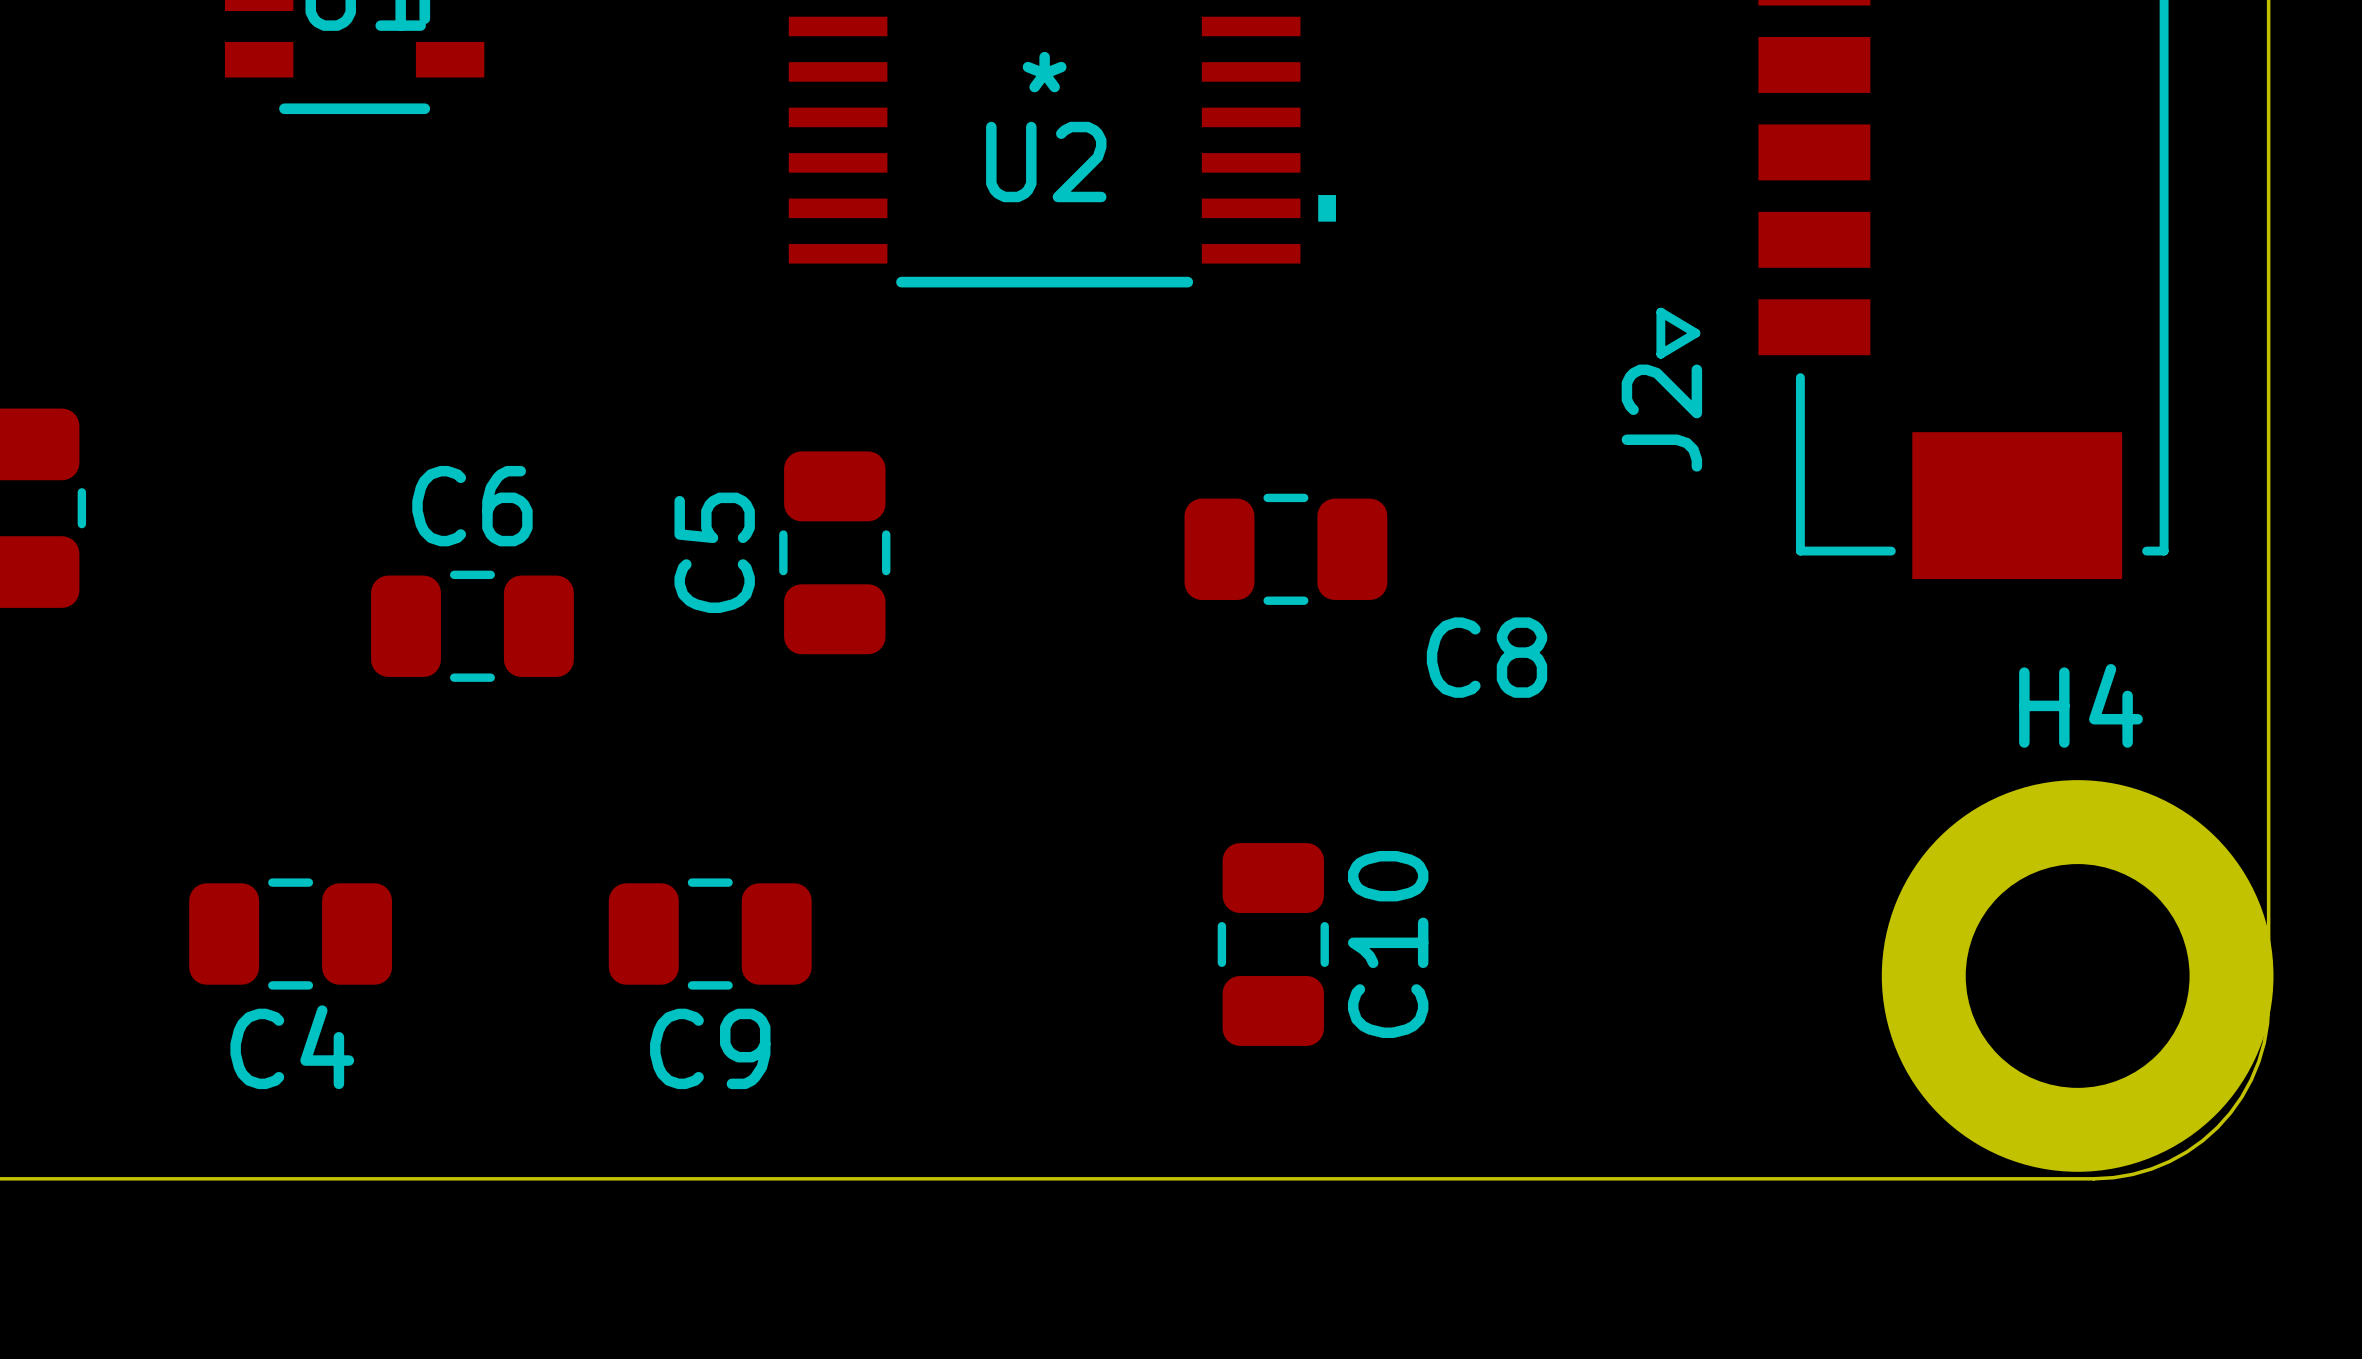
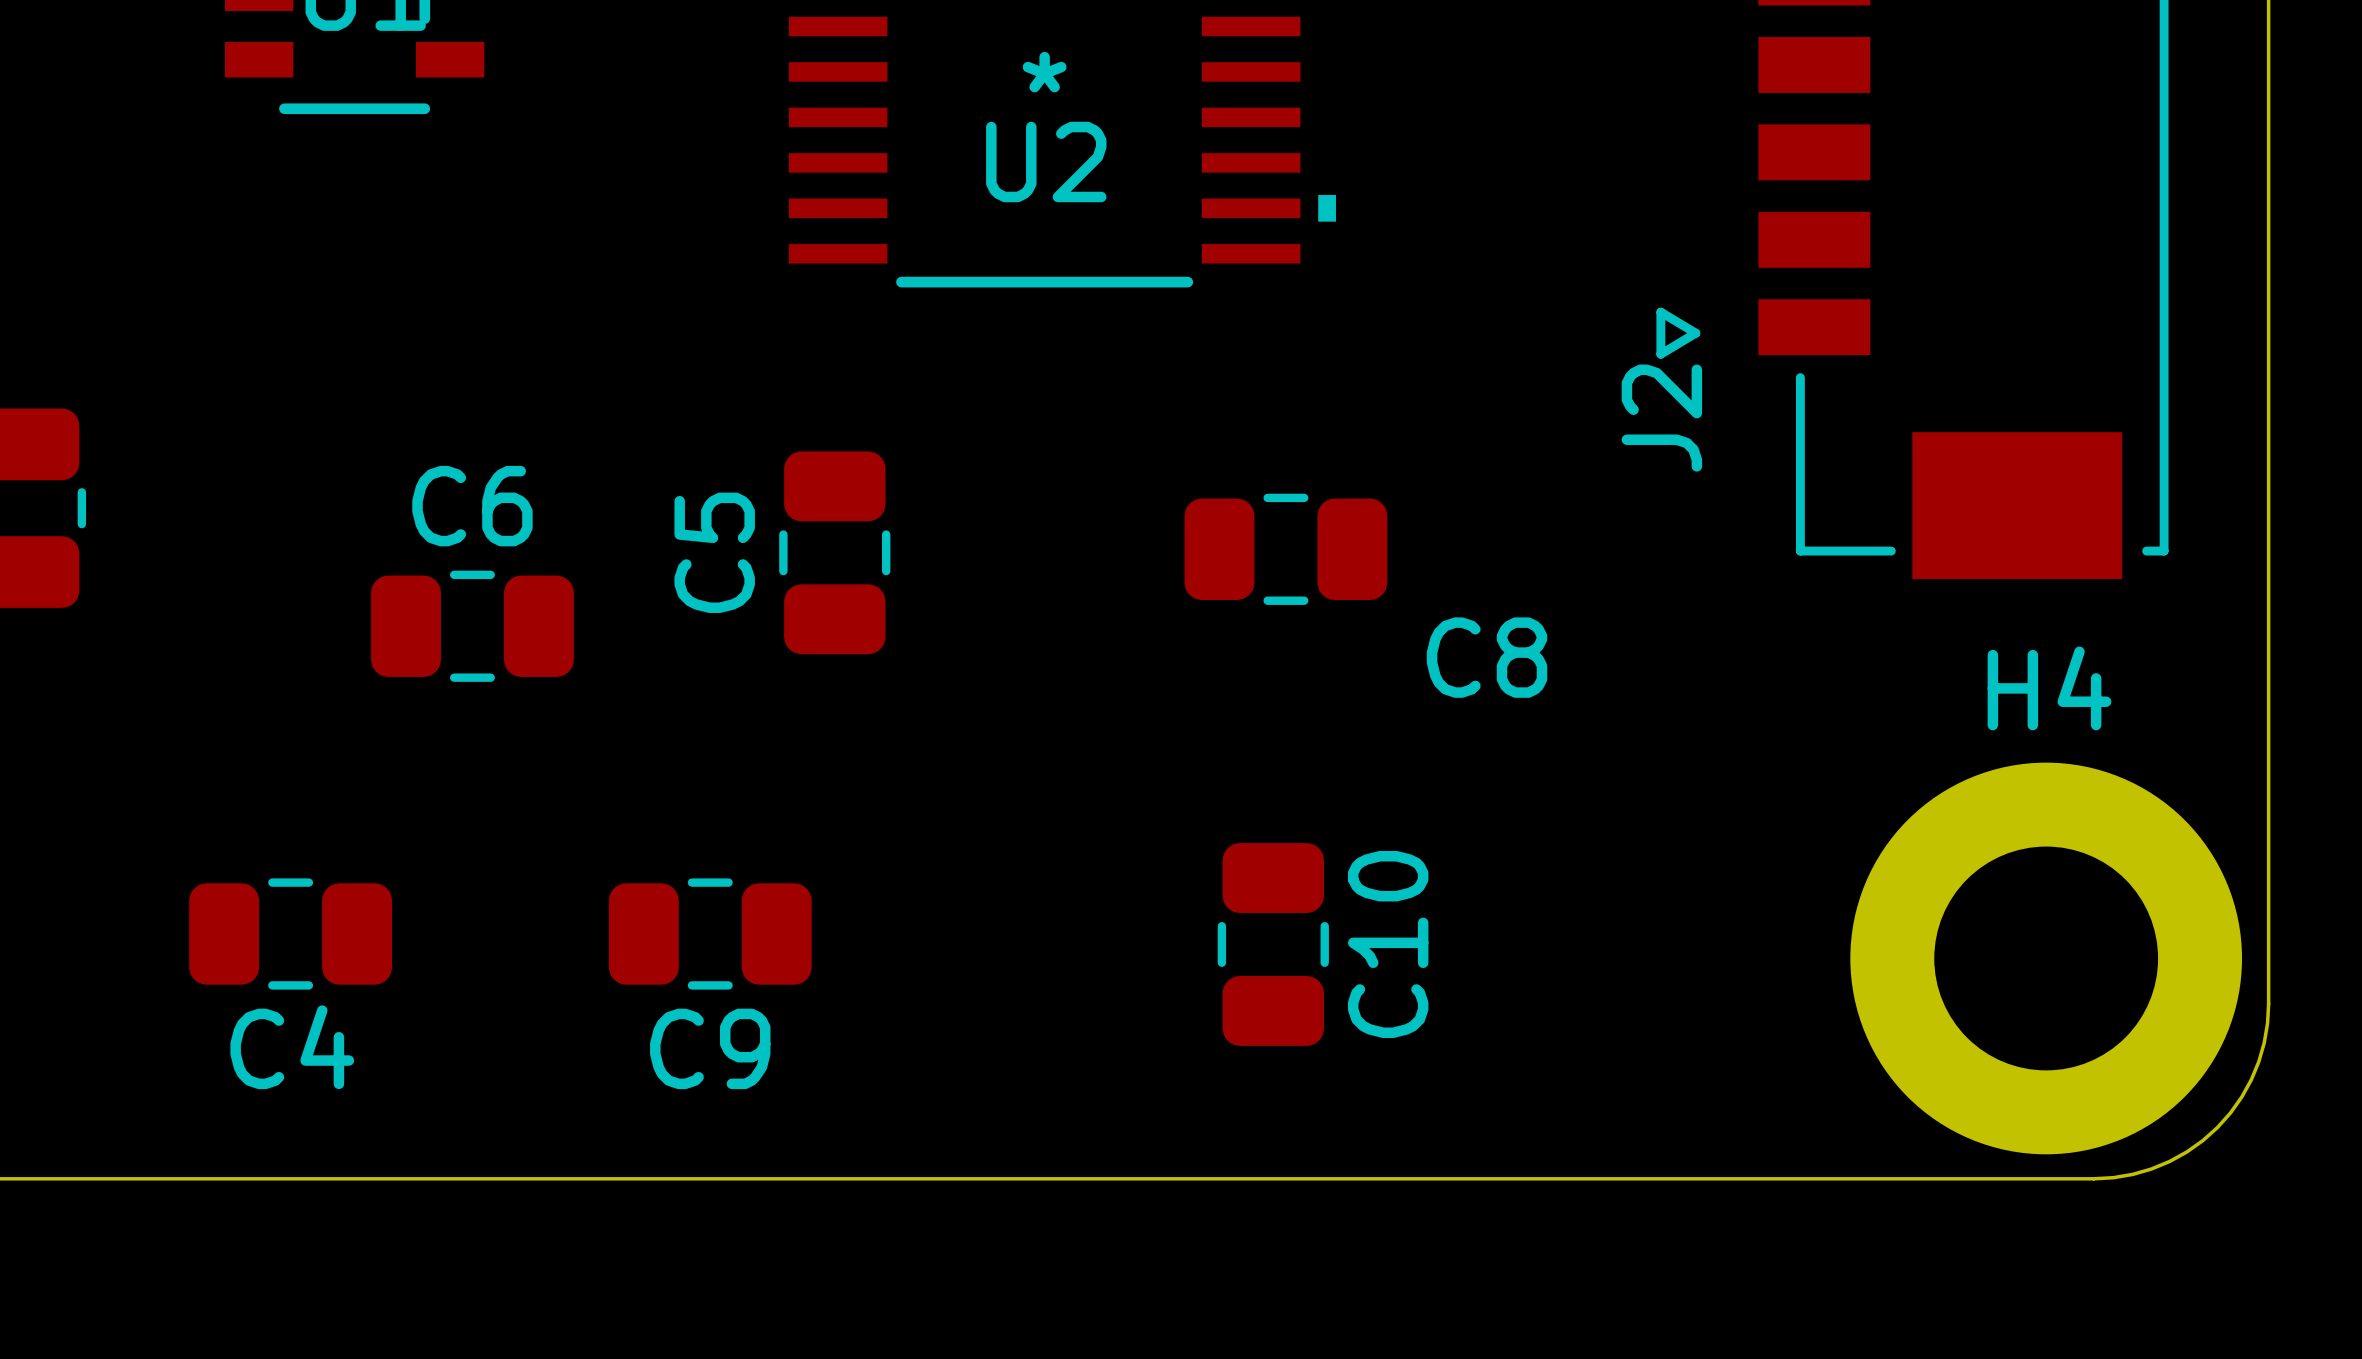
H4 position: (2077, 975) -> (2046, 958)

